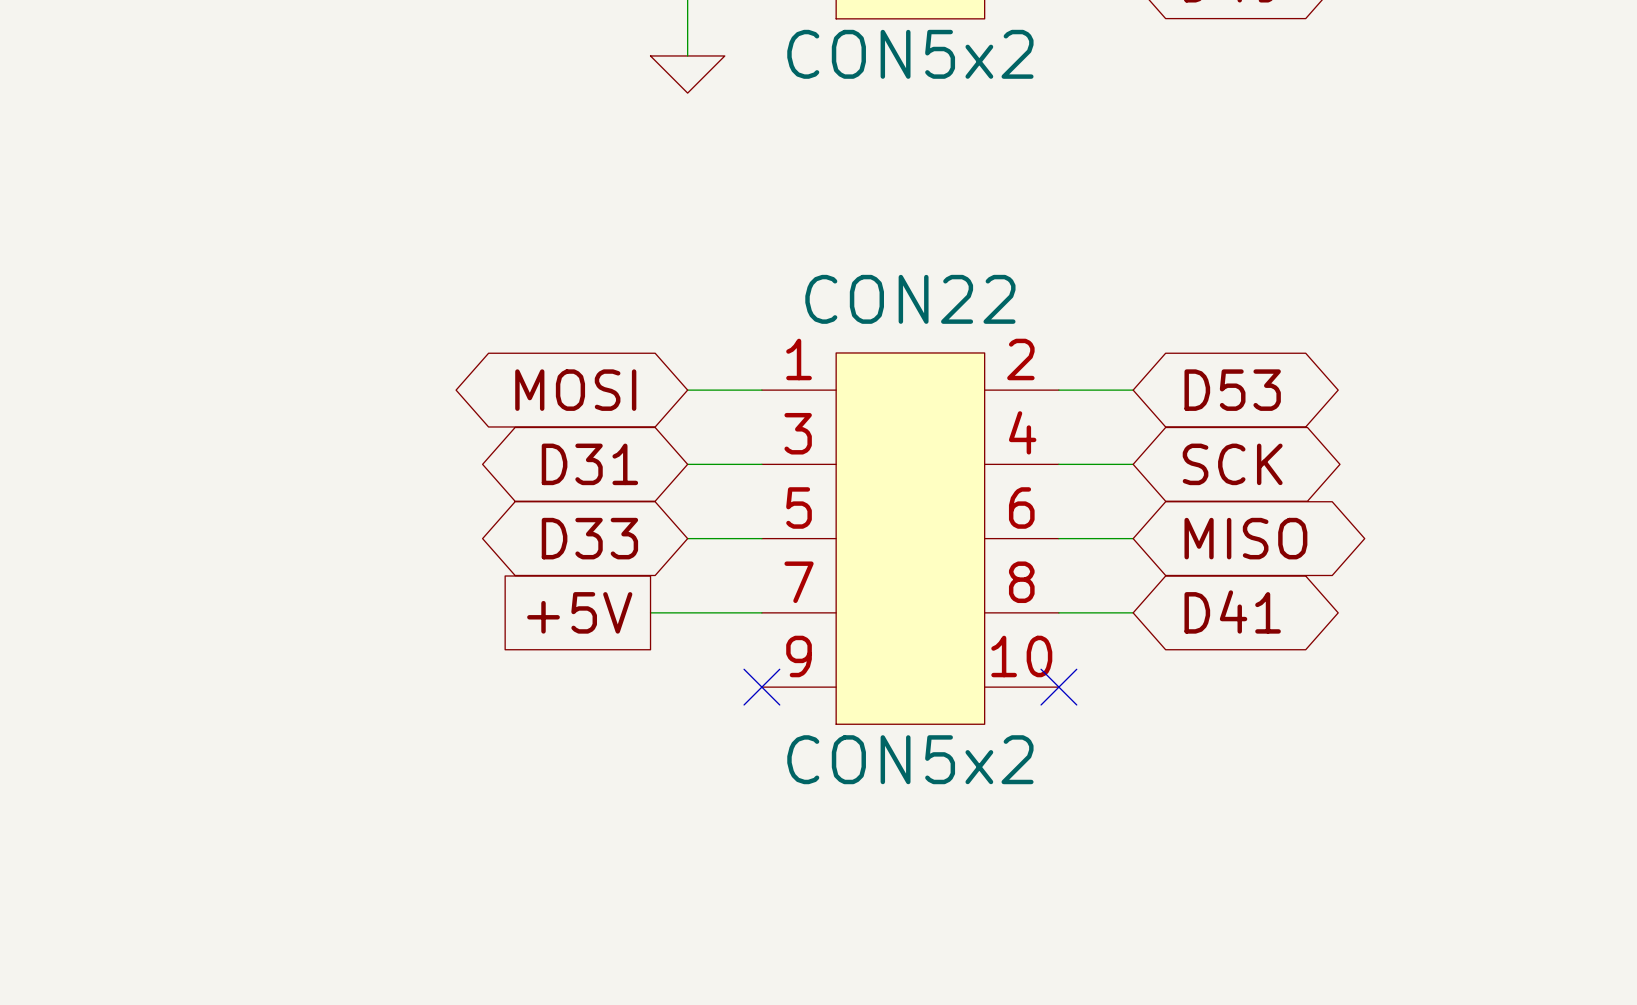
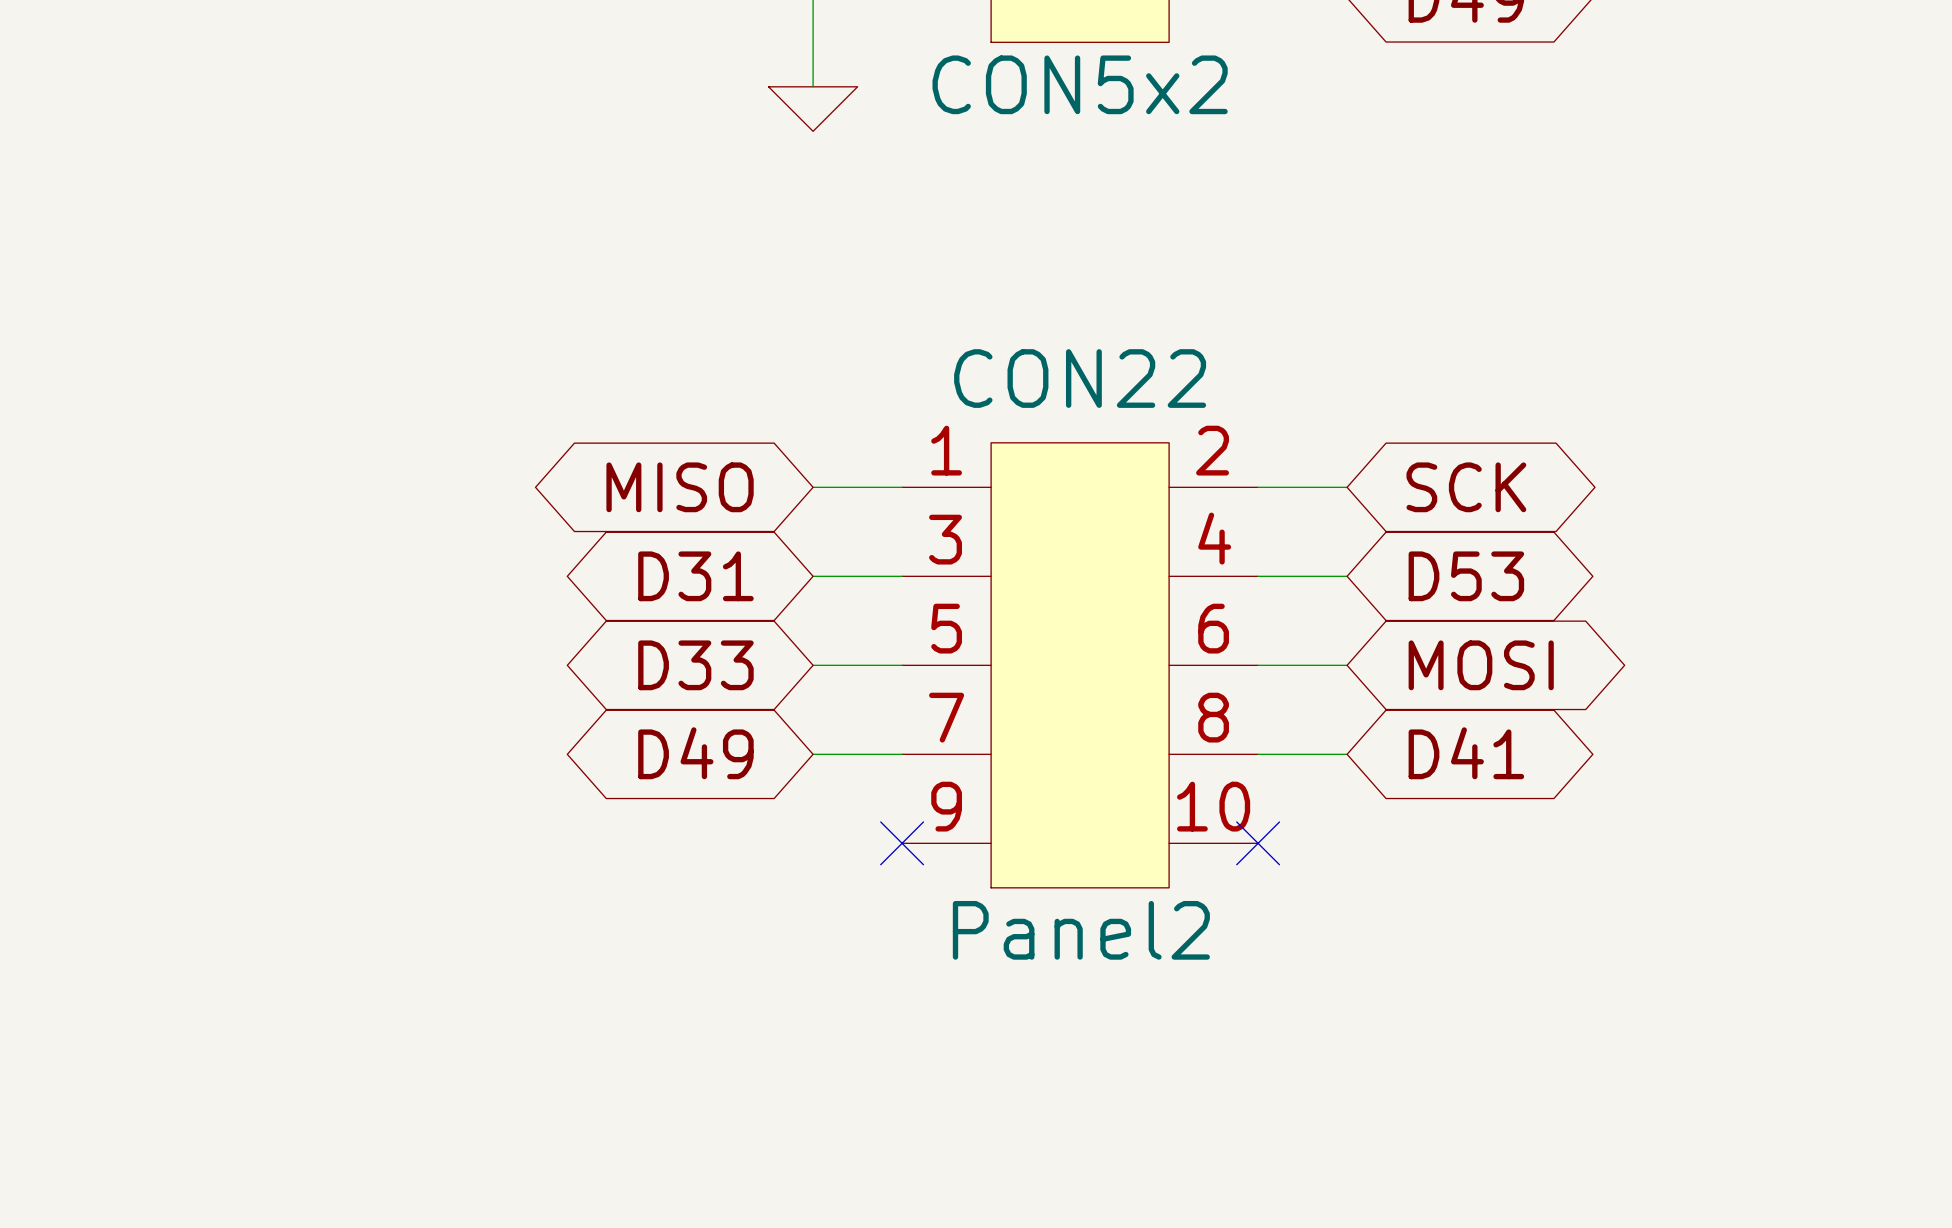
global label: MOSI (575, 390) -> MISO (680, 487)
global label: D53 (1232, 390) -> SCK (1466, 487)
global label: SCK (1232, 464) -> D53 (1466, 576)
global label: MISO (1245, 538) -> MOSI (1481, 665)
global label: none -> D49 (695, 753)
global label: +5V (579, 612) -> none
wire: (650, 612) (687, 612) -> none
CON22 value: CON5x2 (910, 759) -> Panel2 (1081, 930)

